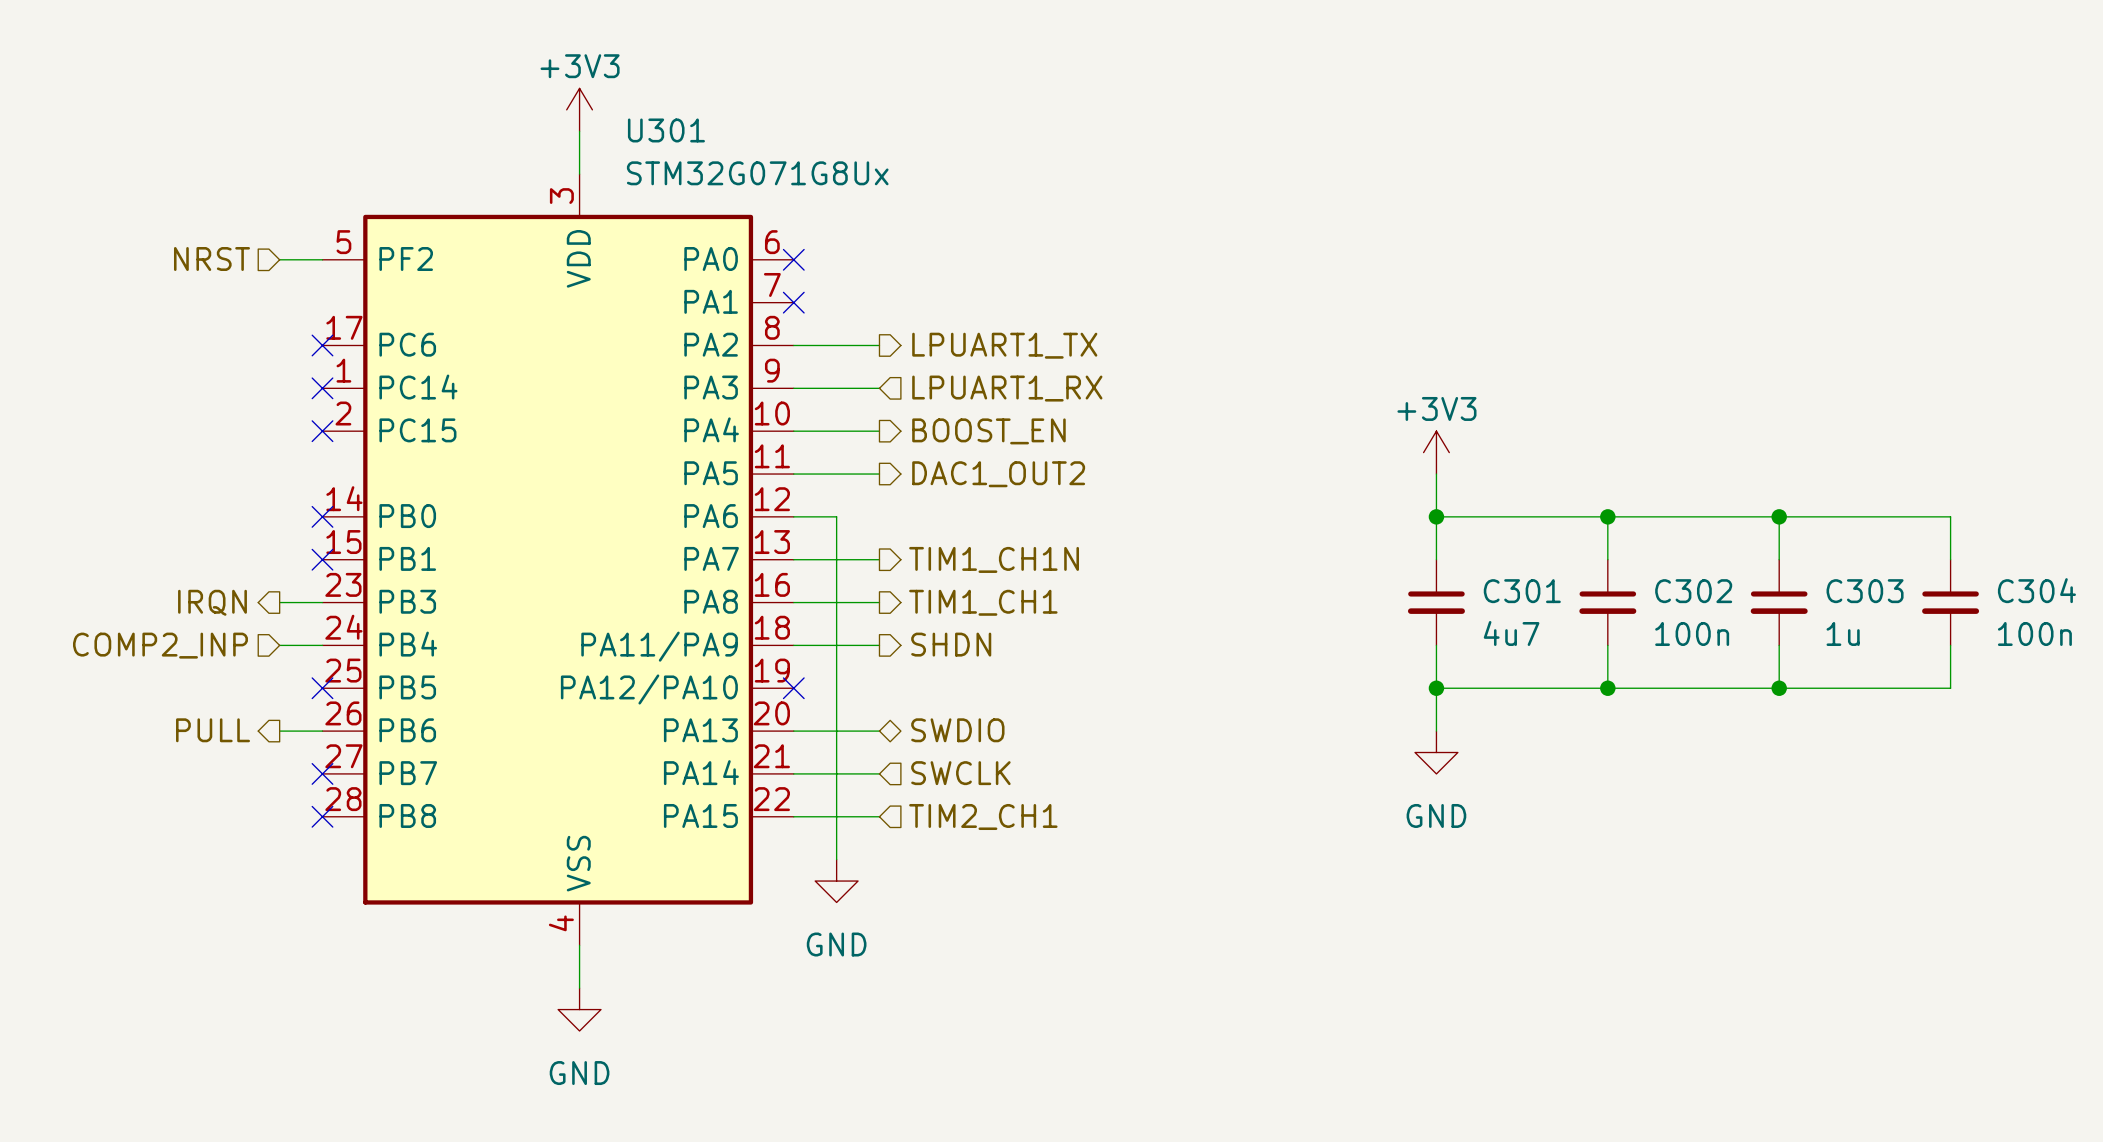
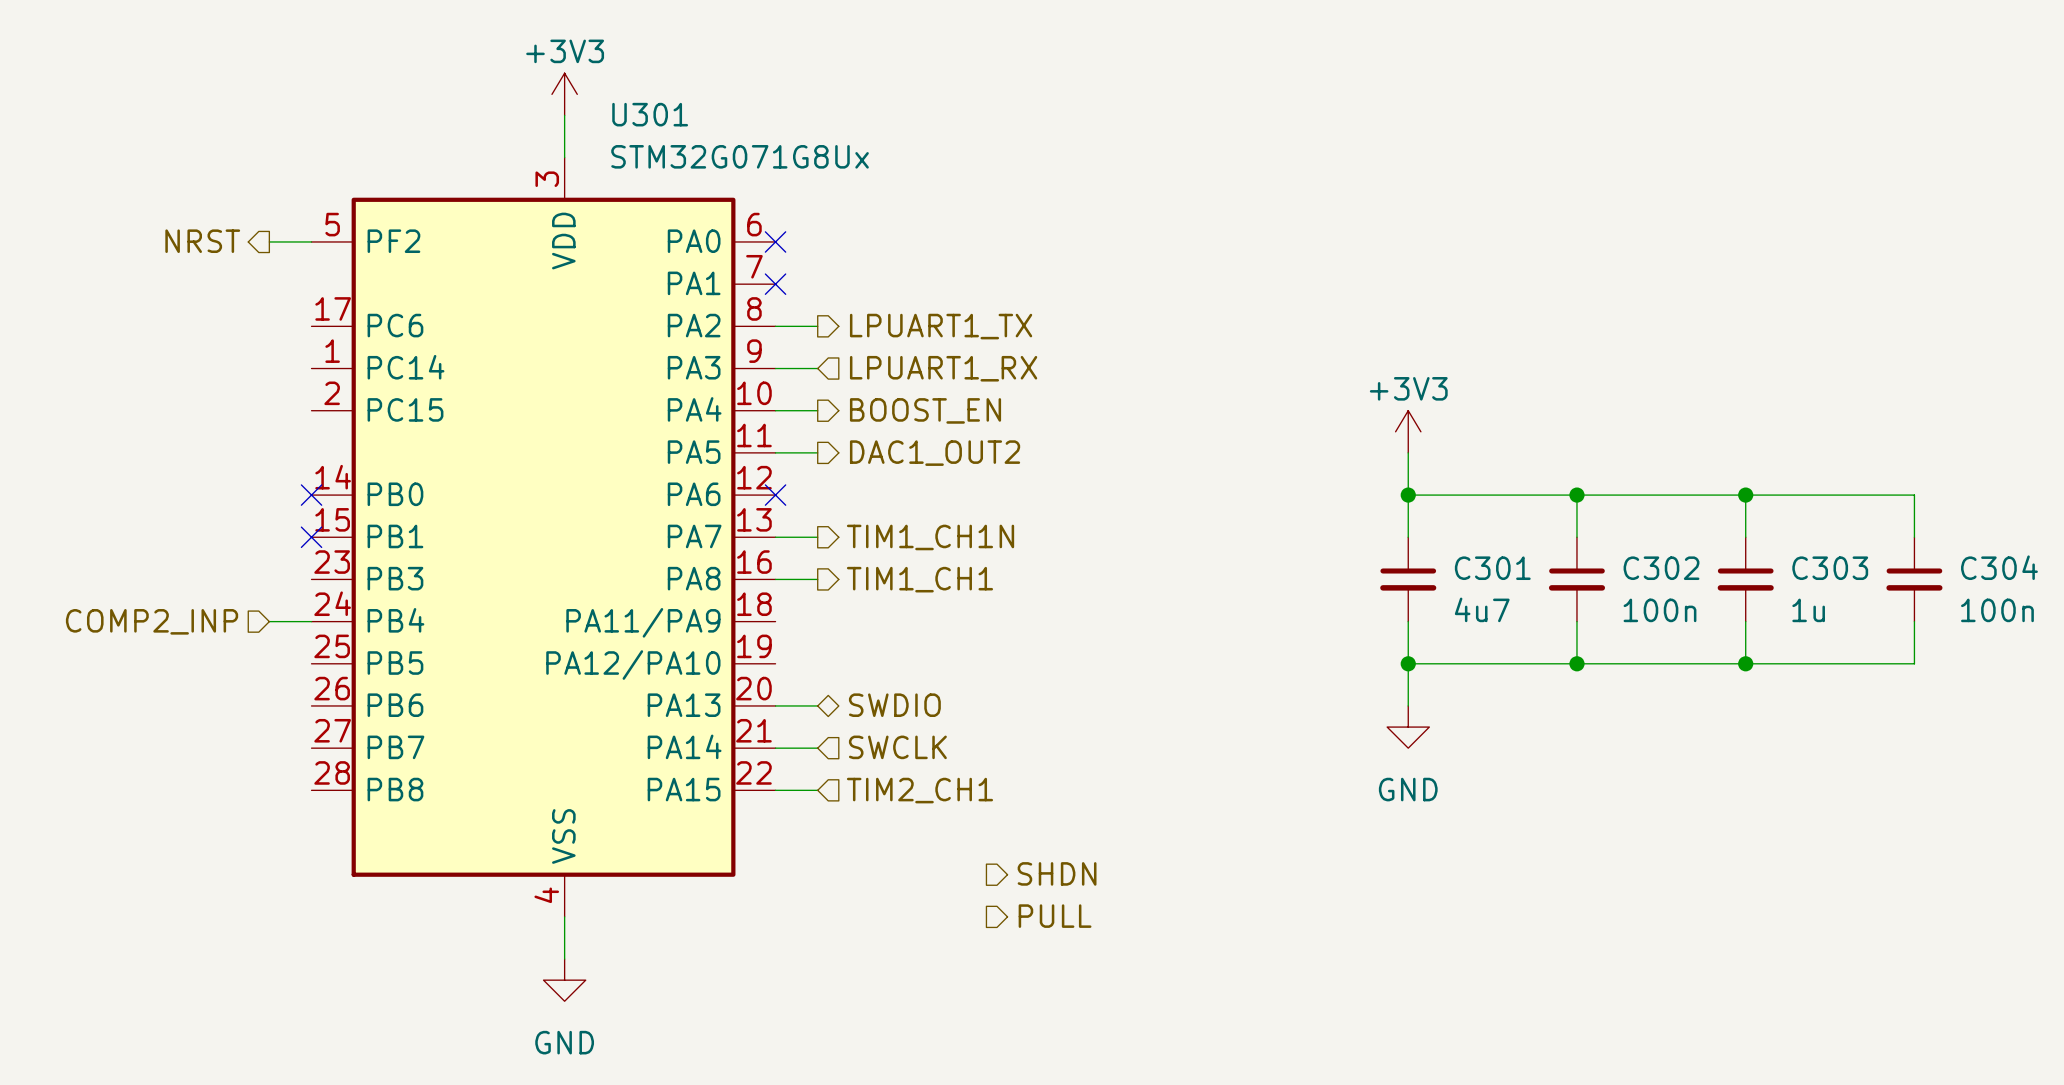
hierarchical label shape: input (211, 259) -> output (202, 241)
no-connect mark: (322, 345) -> none
wire: (836, 345) (879, 345) -> none
hierarchical label position: LPUART1_TX (1004, 345) -> LPUART1_TX (941, 326)
no-connect mark: (322, 388) -> none
wire: (836, 388) (879, 388) -> none
hierarchical label position: LPUART1_RX (1007, 388) -> LPUART1_RX (943, 368)
no-connect mark: (322, 431) -> none
wire: (836, 431) (879, 431) -> none
hierarchical label position: BOOST_EN (988, 431) -> BOOST_EN (925, 410)
wire: (836, 474) (879, 474) -> none
hierarchical label position: DAC1_OUT2 (998, 474) -> DAC1_OUT2 (935, 453)
wire: (793, 516) (836, 516) (836, 859) -> none
no-connect mark: none -> (775, 495)
wire: (836, 559) (879, 559) -> none
hierarchical label position: TIM1_CH1N (994, 559) -> TIM1_CH1N (930, 537)
hierarchical label: IRQN (212, 602) -> none
wire: (279, 602) (322, 602) -> none
wire: (836, 602) (879, 602) -> none
hierarchical label position: TIM1_CH1 (983, 602) -> TIM1_CH1 (919, 579)
hierarchical label position: SHDN (951, 644) -> SHDN (1057, 873)
wire: (793, 645) (879, 645) -> none
no-connect mark: (322, 688) -> none
no-connect mark: (793, 688) -> none
hierarchical label: PULL (213, 730) -> none
hierarchical label position: SWDIO (957, 730) -> SWDIO (894, 705)
wire: (279, 731) (322, 731) -> none
wire: (836, 731) (879, 731) -> none
no-connect mark: (322, 773) -> none
wire: (836, 773) (879, 773) -> none
hierarchical label position: SWCLK (960, 773) -> SWCLK (897, 747)
no-connect mark: (322, 816) -> none
wire: (836, 816) (879, 816) -> none
hierarchical label position: TIM2_CH1 (983, 816) -> TIM2_CH1 (919, 790)
power symbol: GND (836, 881) -> none
hierarchical label: none -> PULL (1055, 916)

